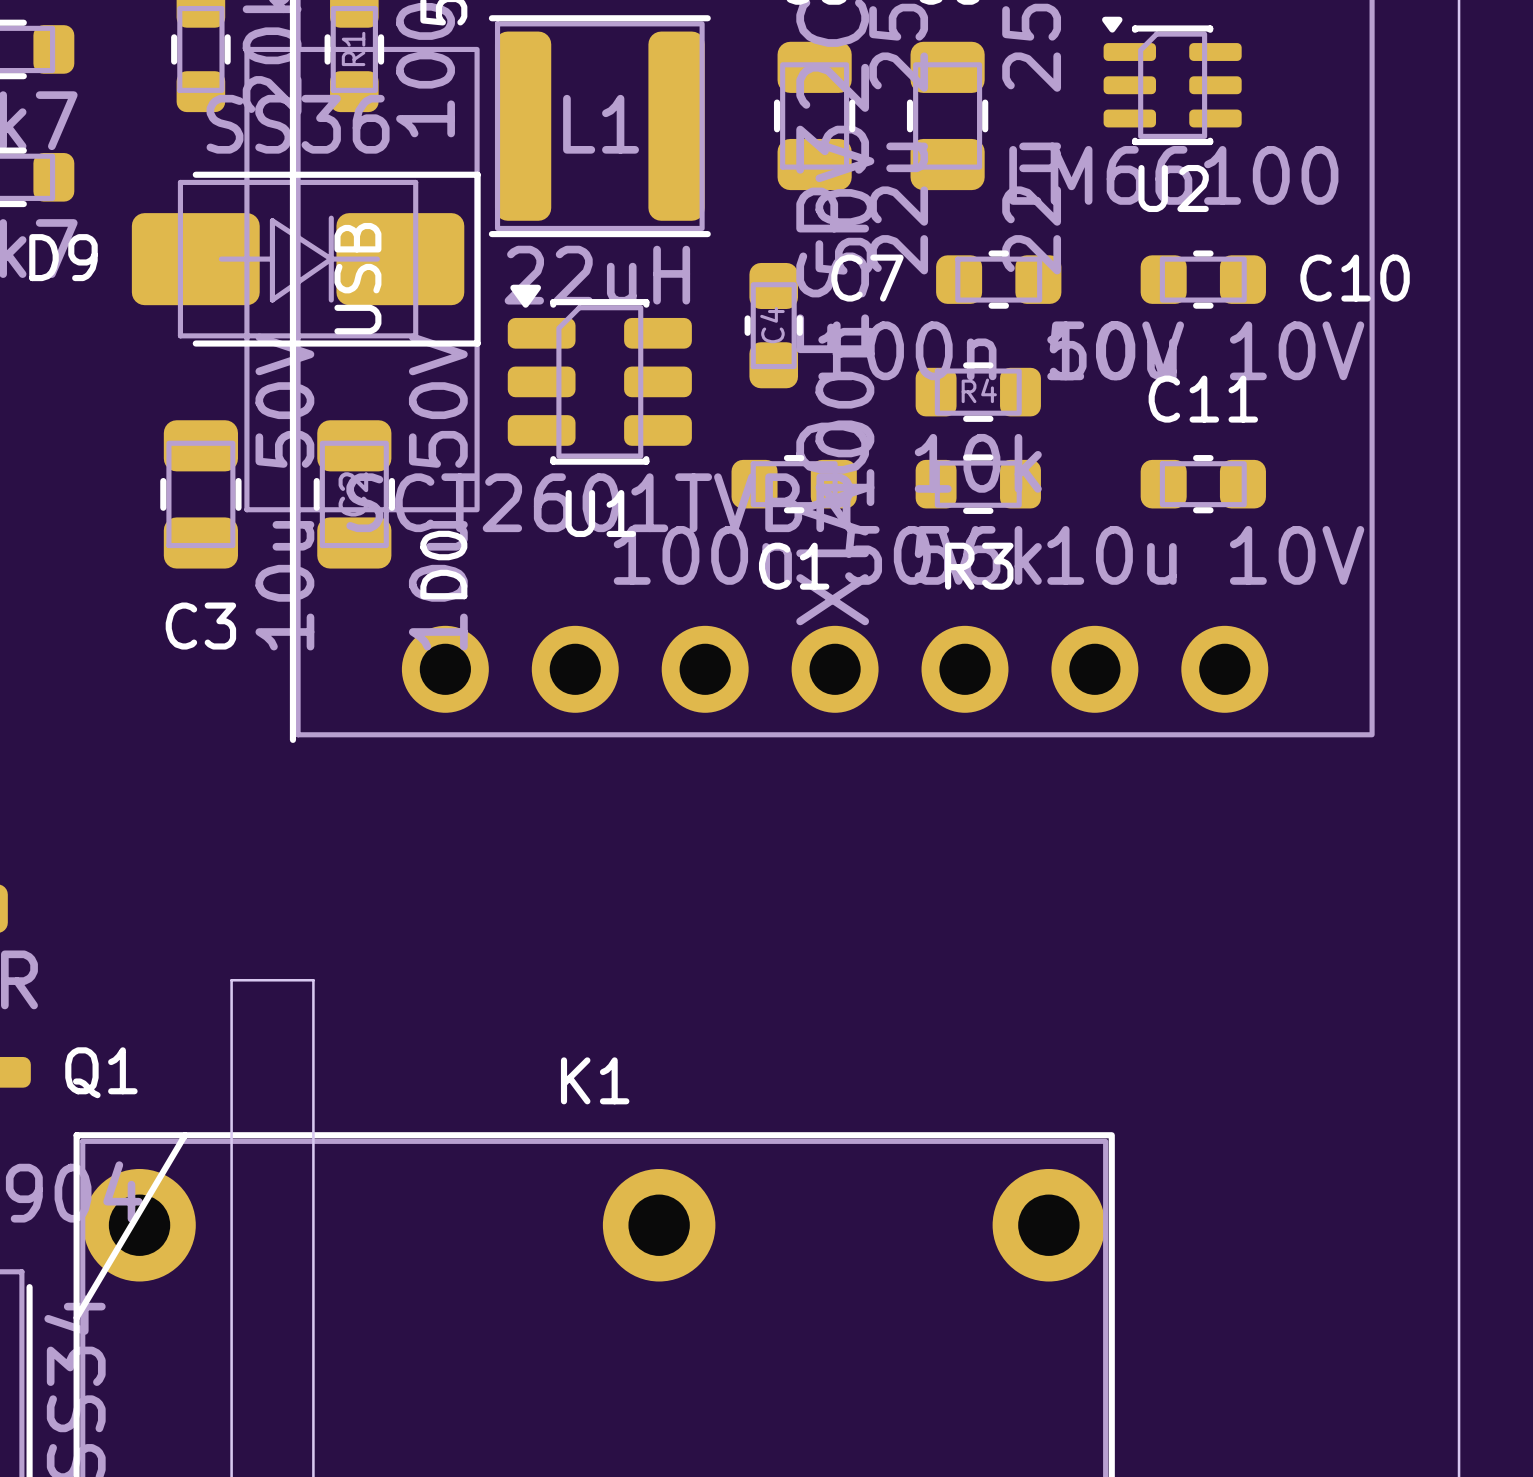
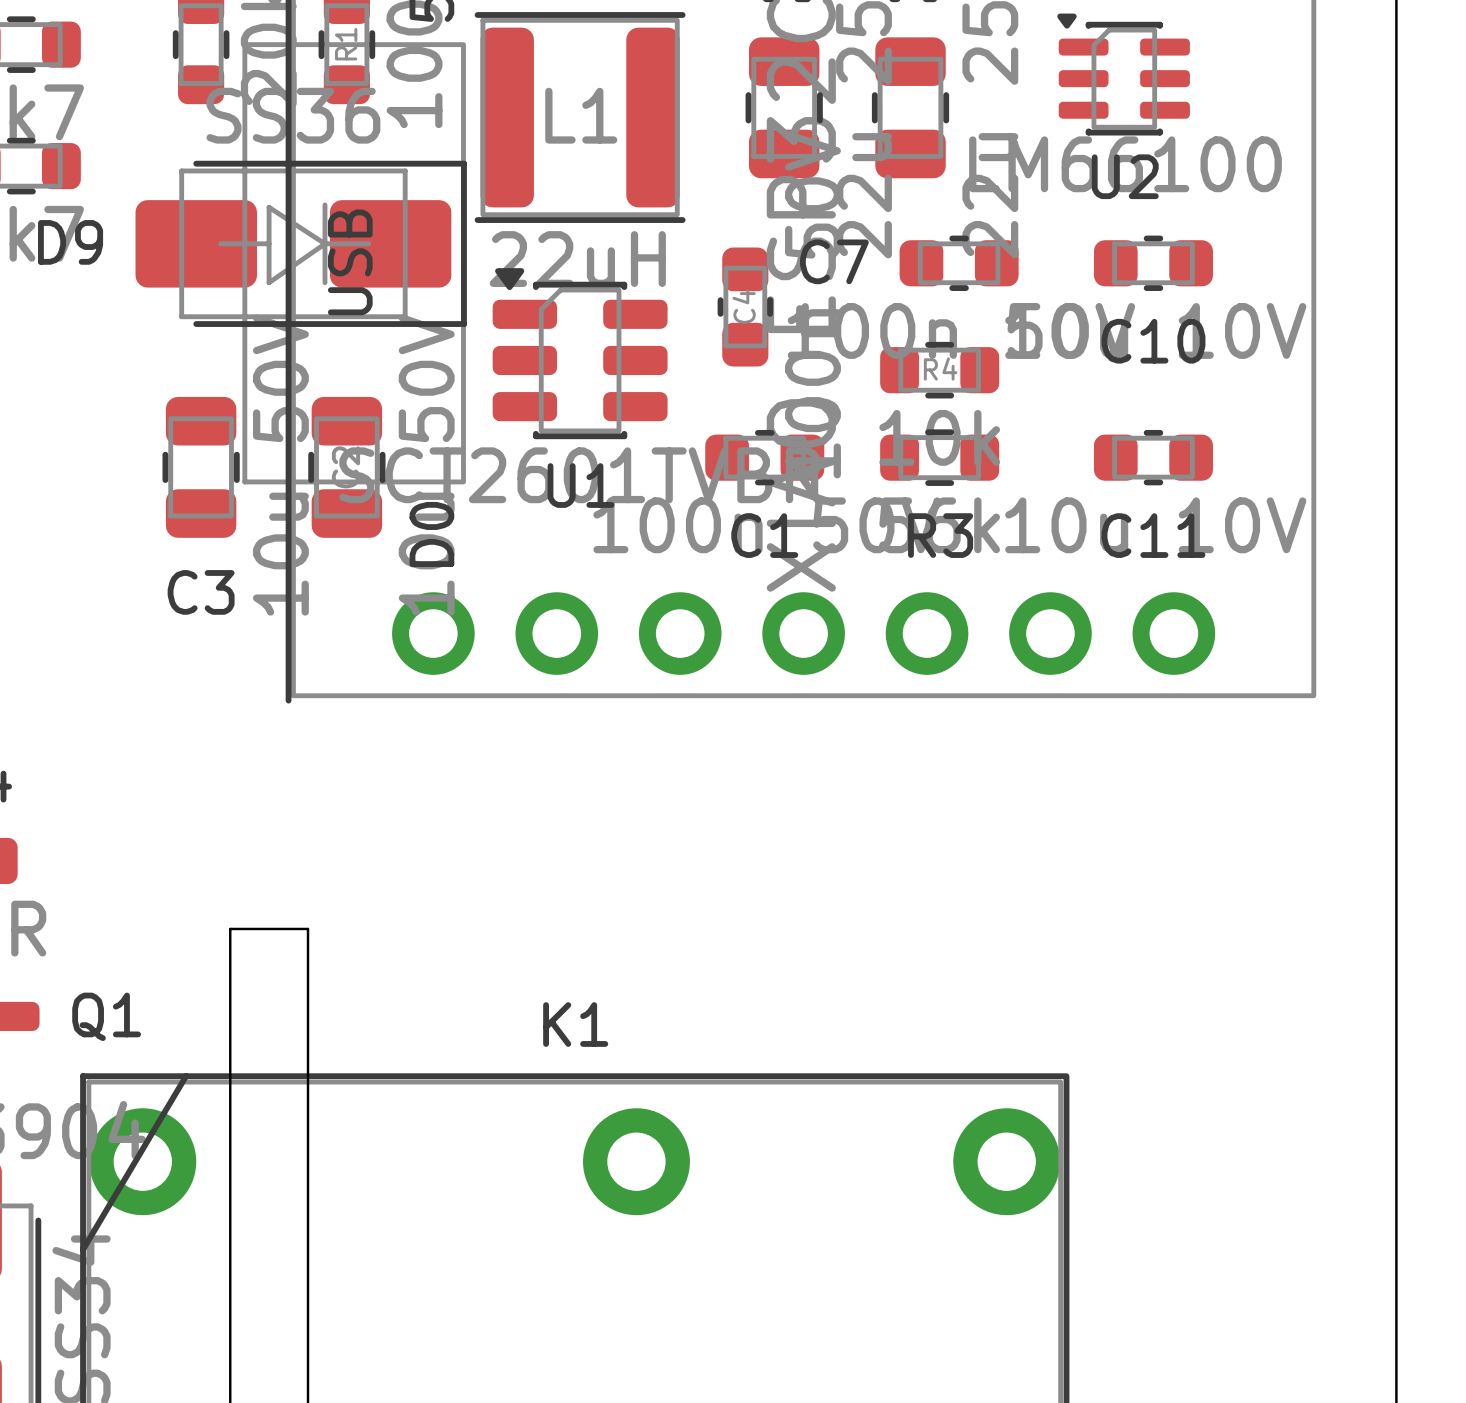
C10 name position: C10 (1355, 278) -> C10 (1153, 341)
C11 name position: C11 (1203, 399) -> C11 (1153, 535)

